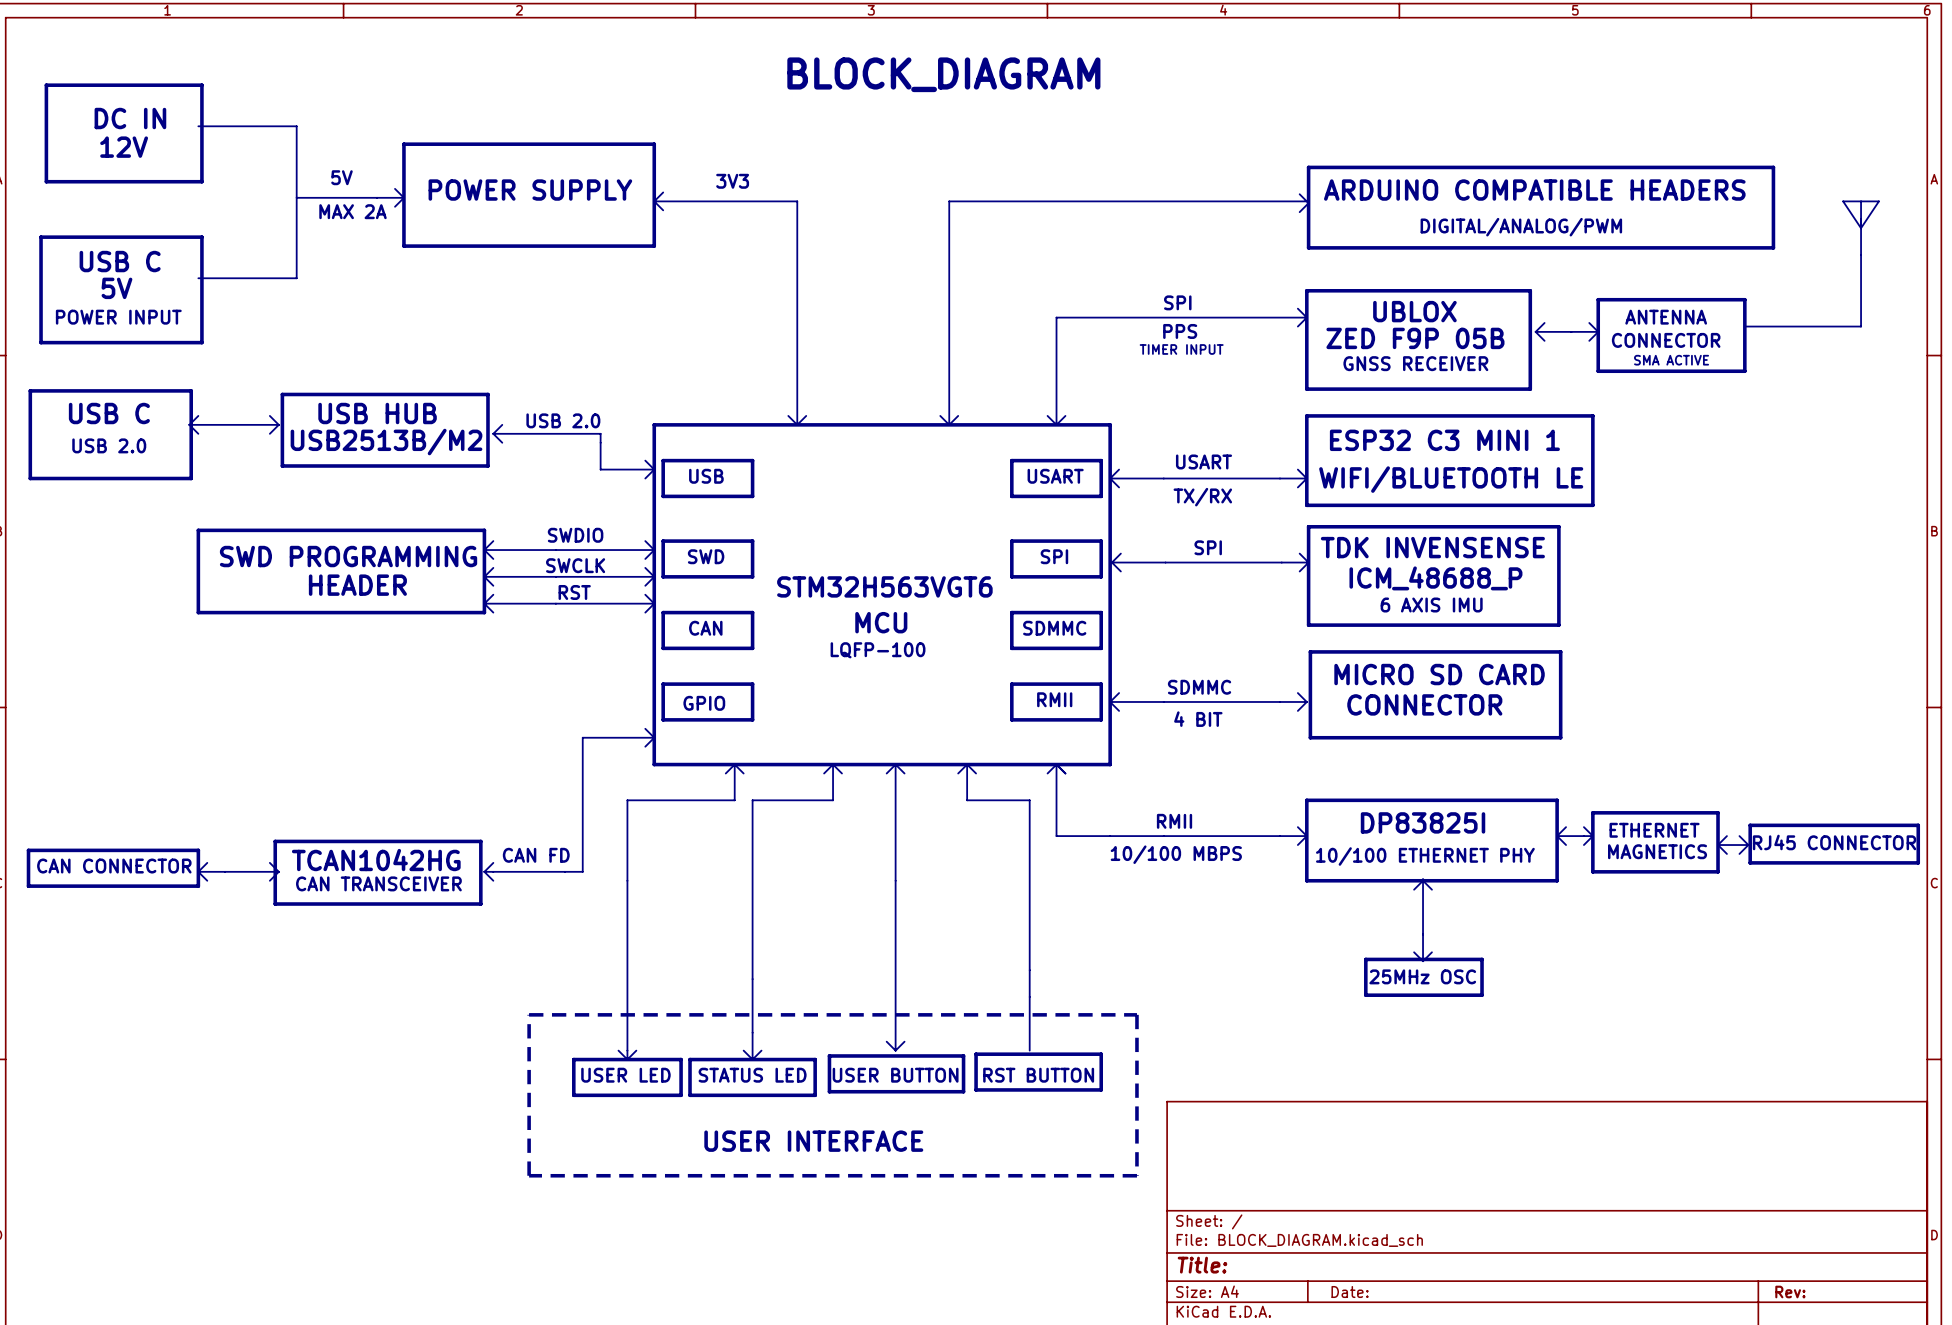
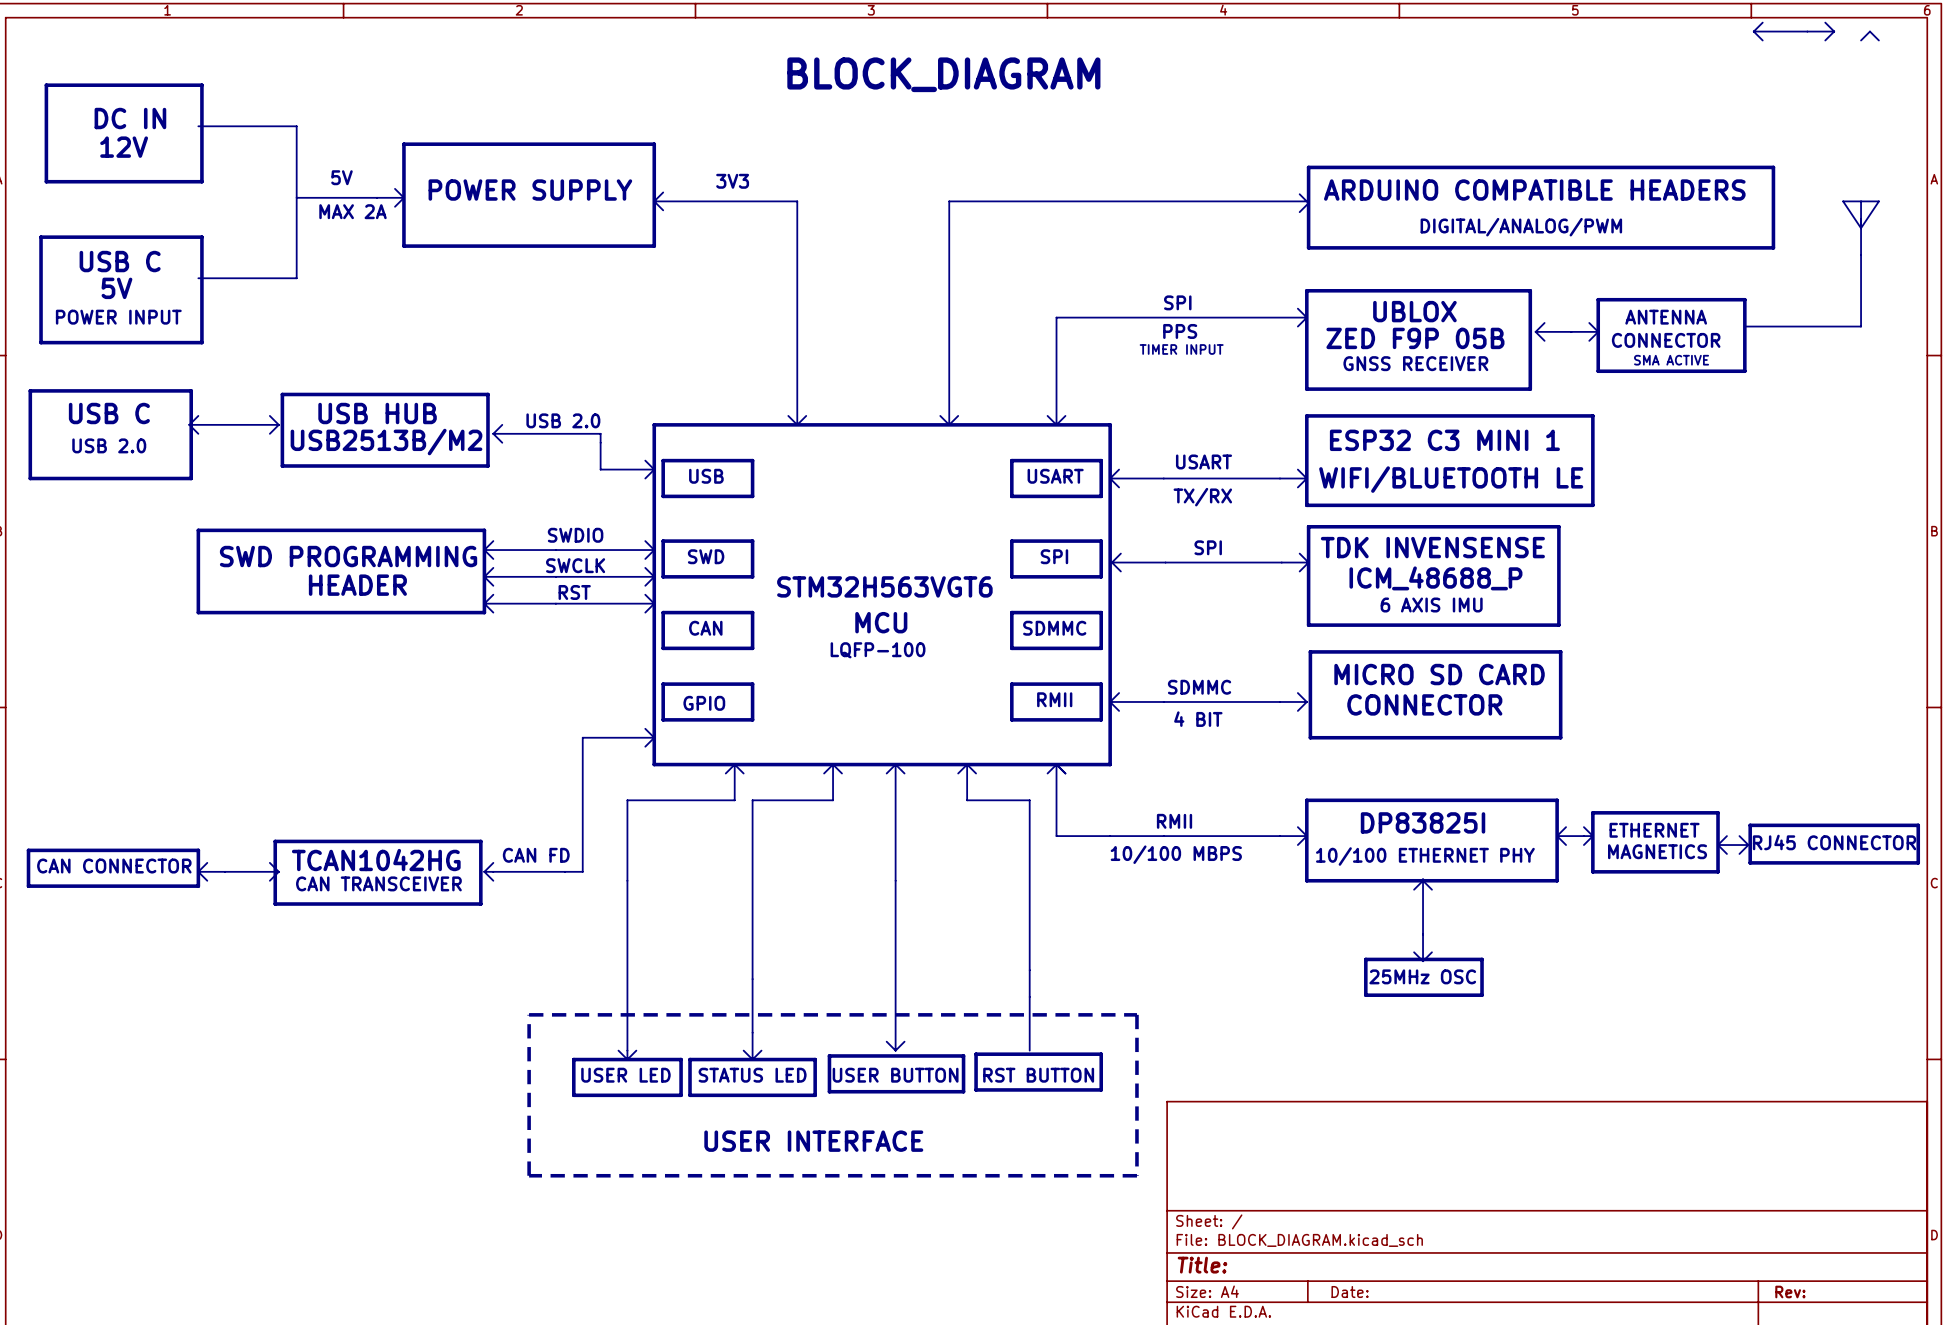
line: none -> (1762, 22) (1753, 31)
line: none -> (1825, 22) (1834, 31)
line: none -> (1753, 31) (1834, 31)
line: none -> (1753, 31) (1762, 40)
line: none -> (1834, 31) (1825, 40)
line: none -> (1861, 40) (1869, 31) (1878, 40)

